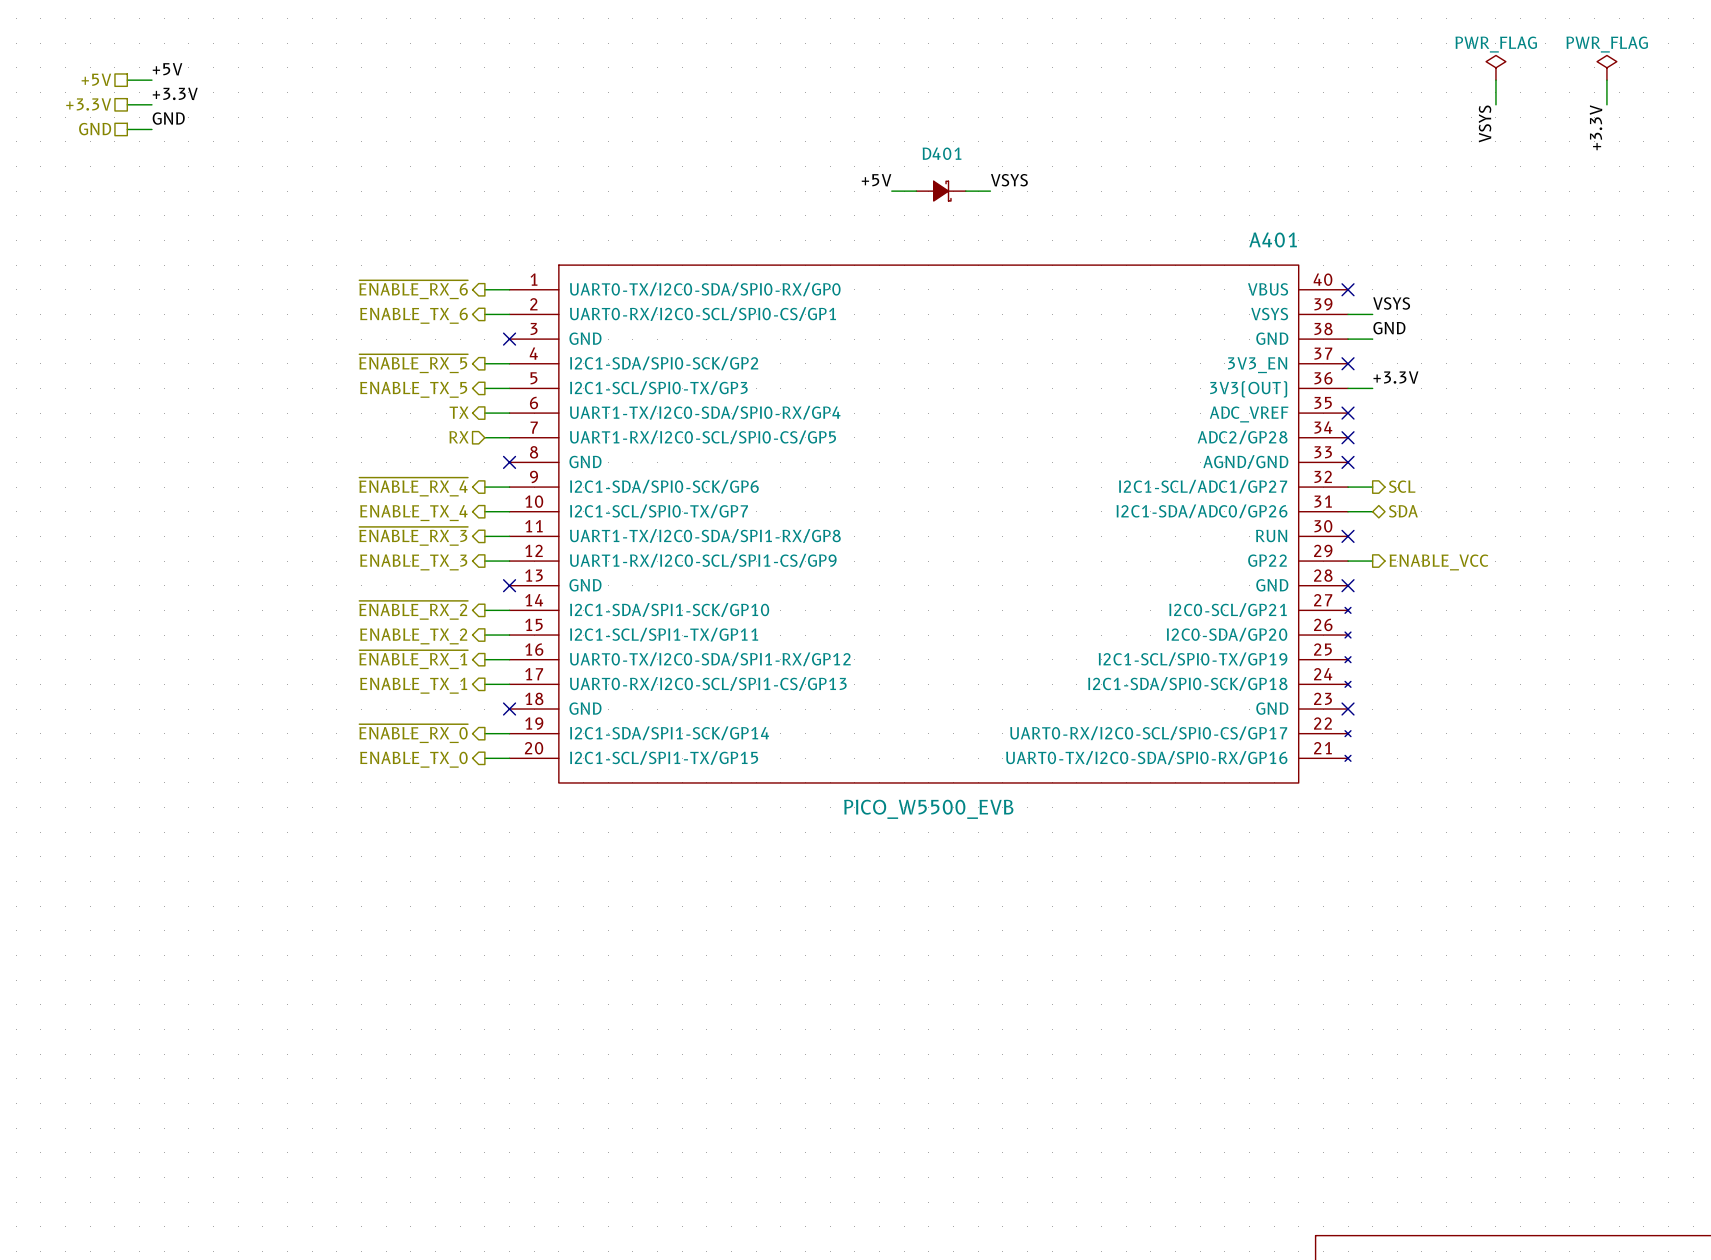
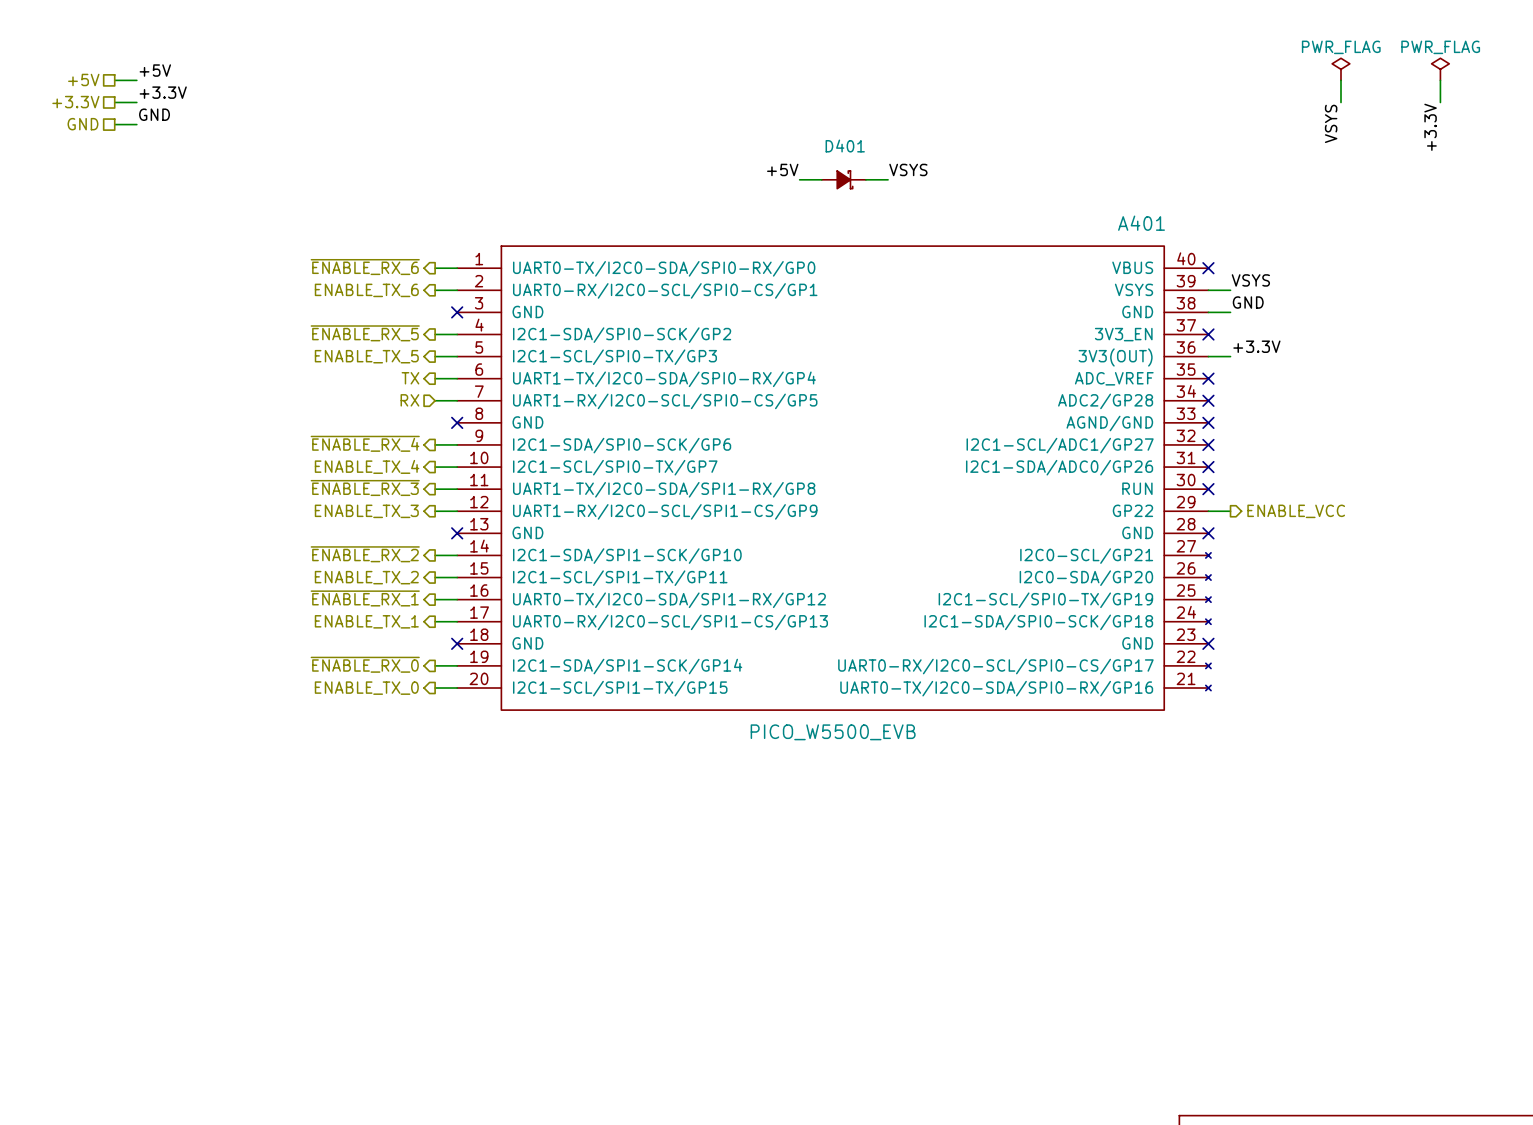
hierarchical label: SCL (1402, 486) -> none
wire: (1348, 487) (1372, 487) -> none
no-connect mark: none -> (1208, 444)
wire: (1348, 511) (1372, 511) -> none
no-connect mark: none -> (1208, 467)
hierarchical label: SDA (1403, 511) -> none

